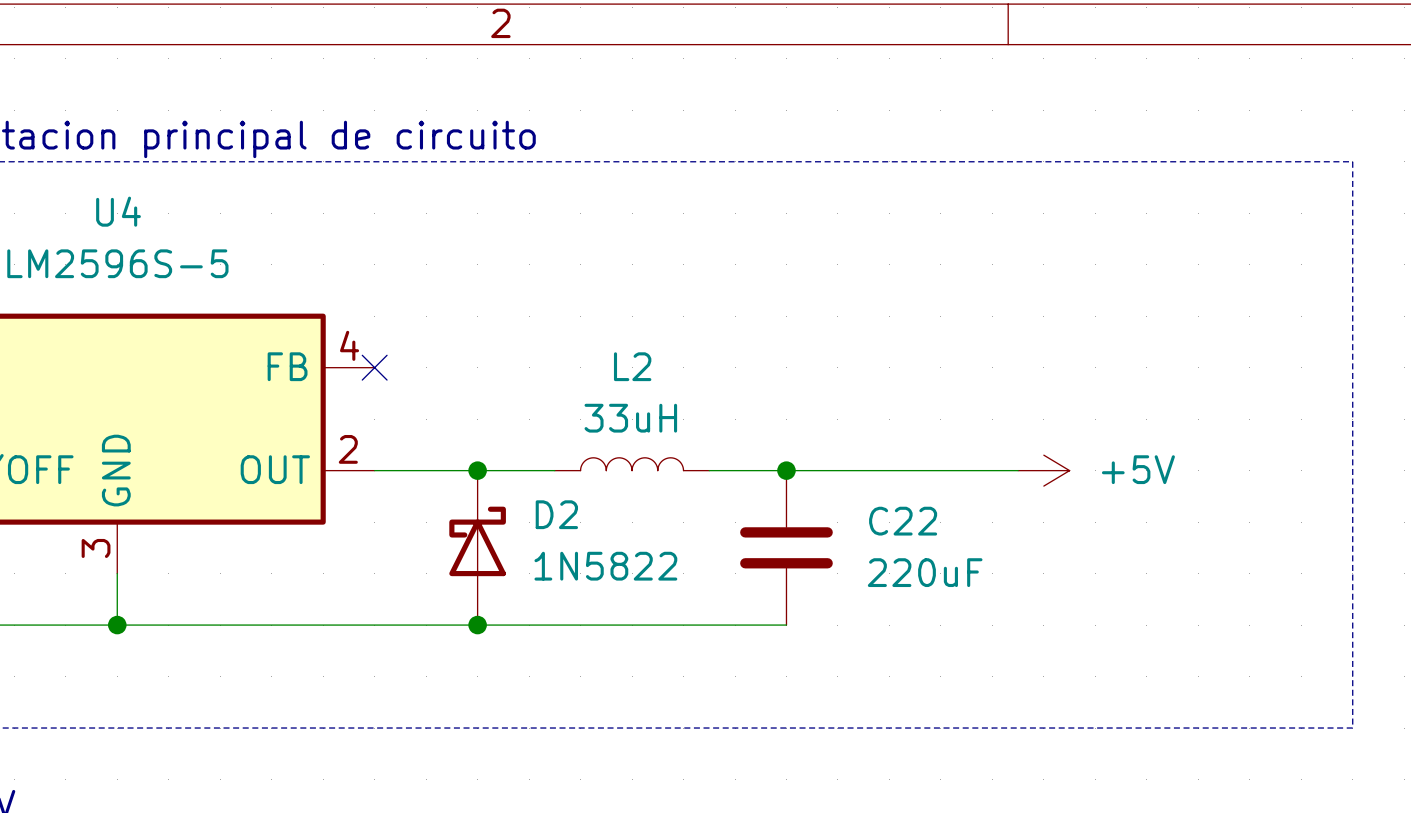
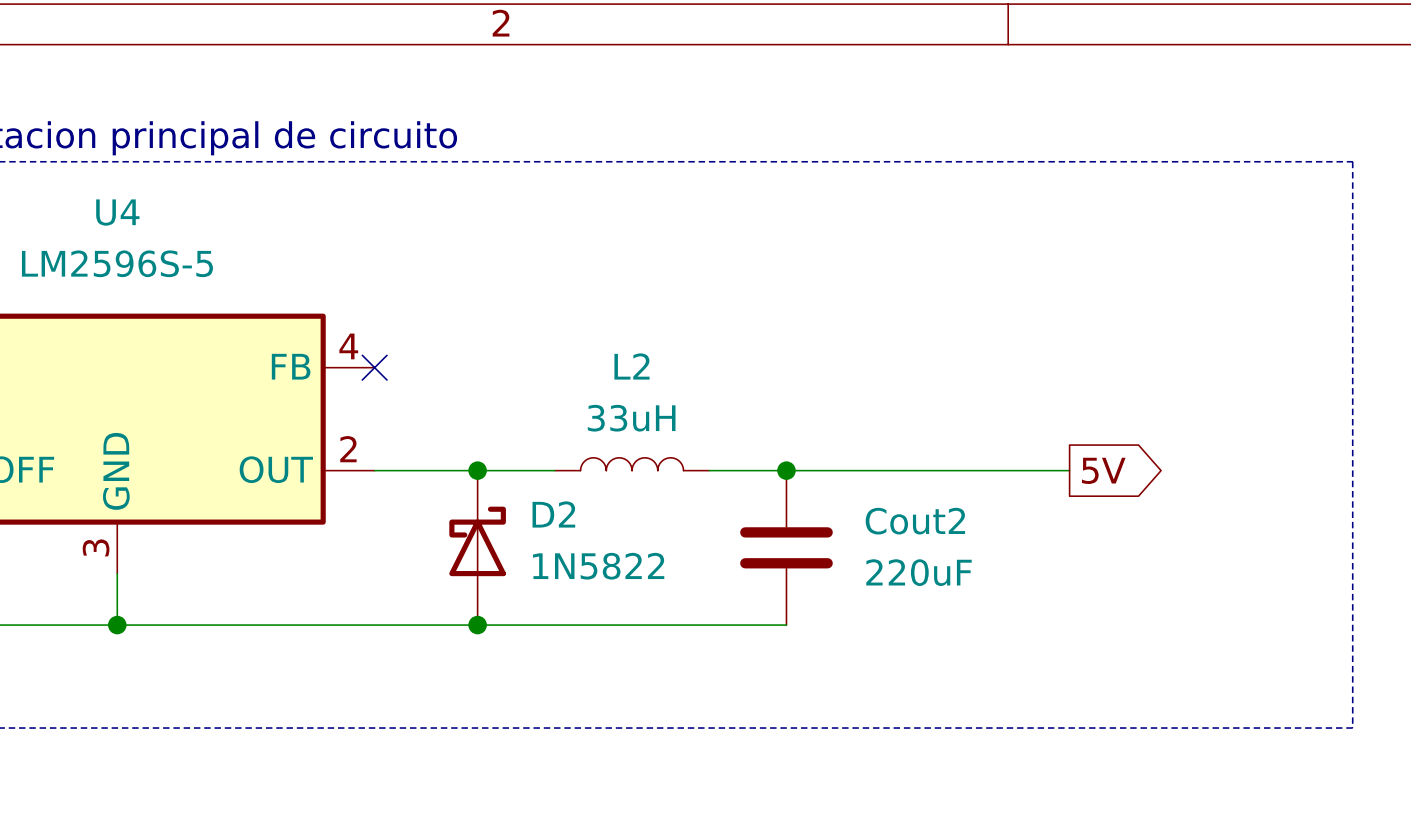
power symbol: +5V (1043, 470) -> none
global label: none -> 5V (1103, 470)
C22 name: C22 (903, 521) -> Cout2 (915, 521)

